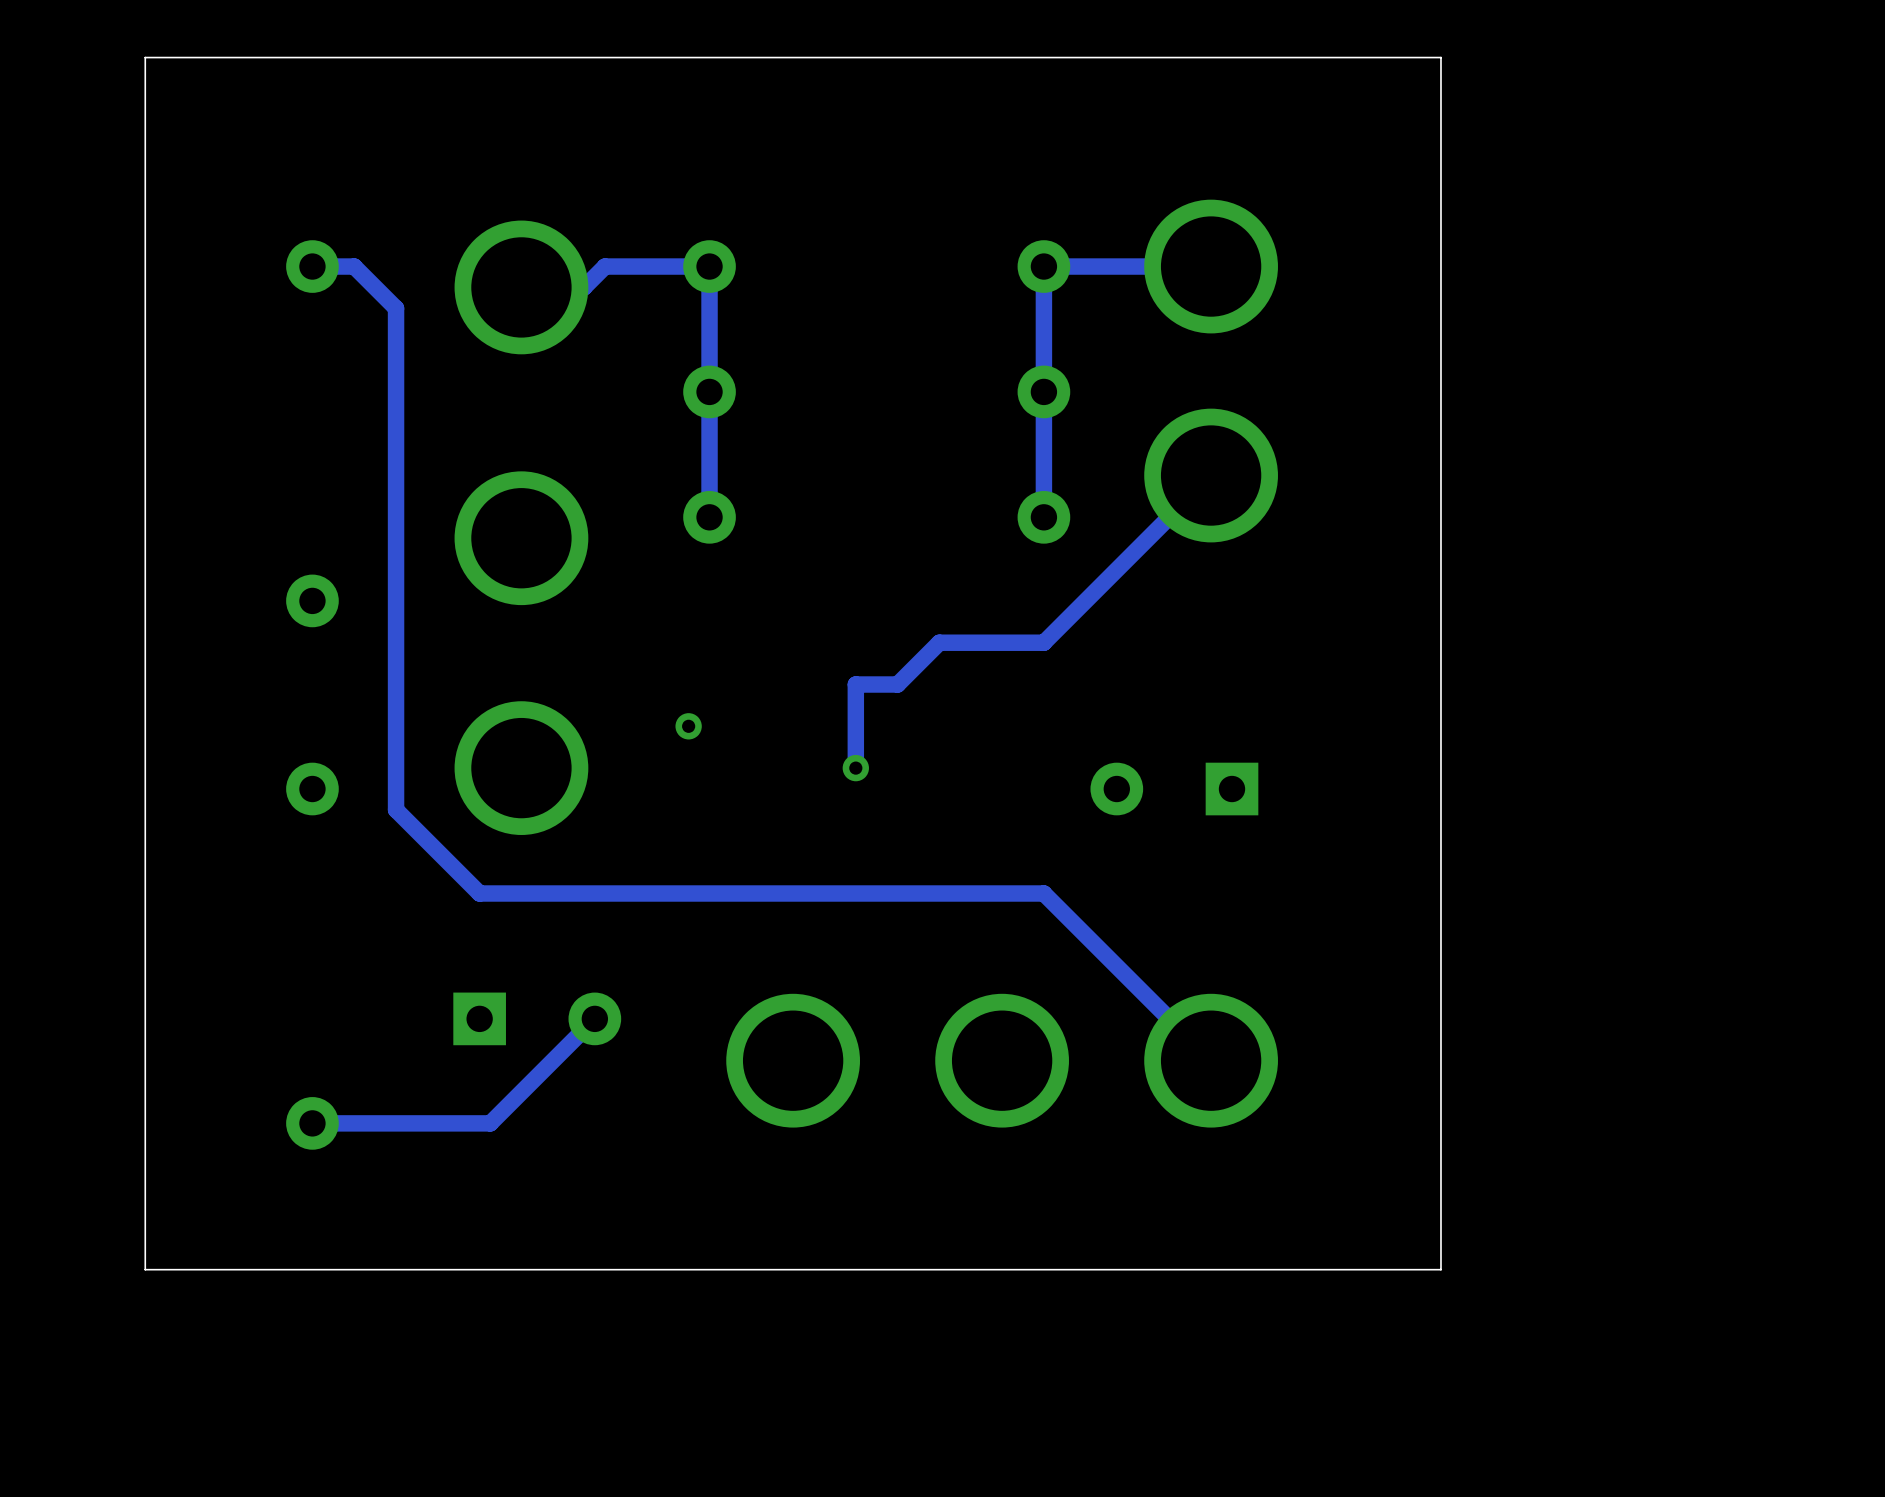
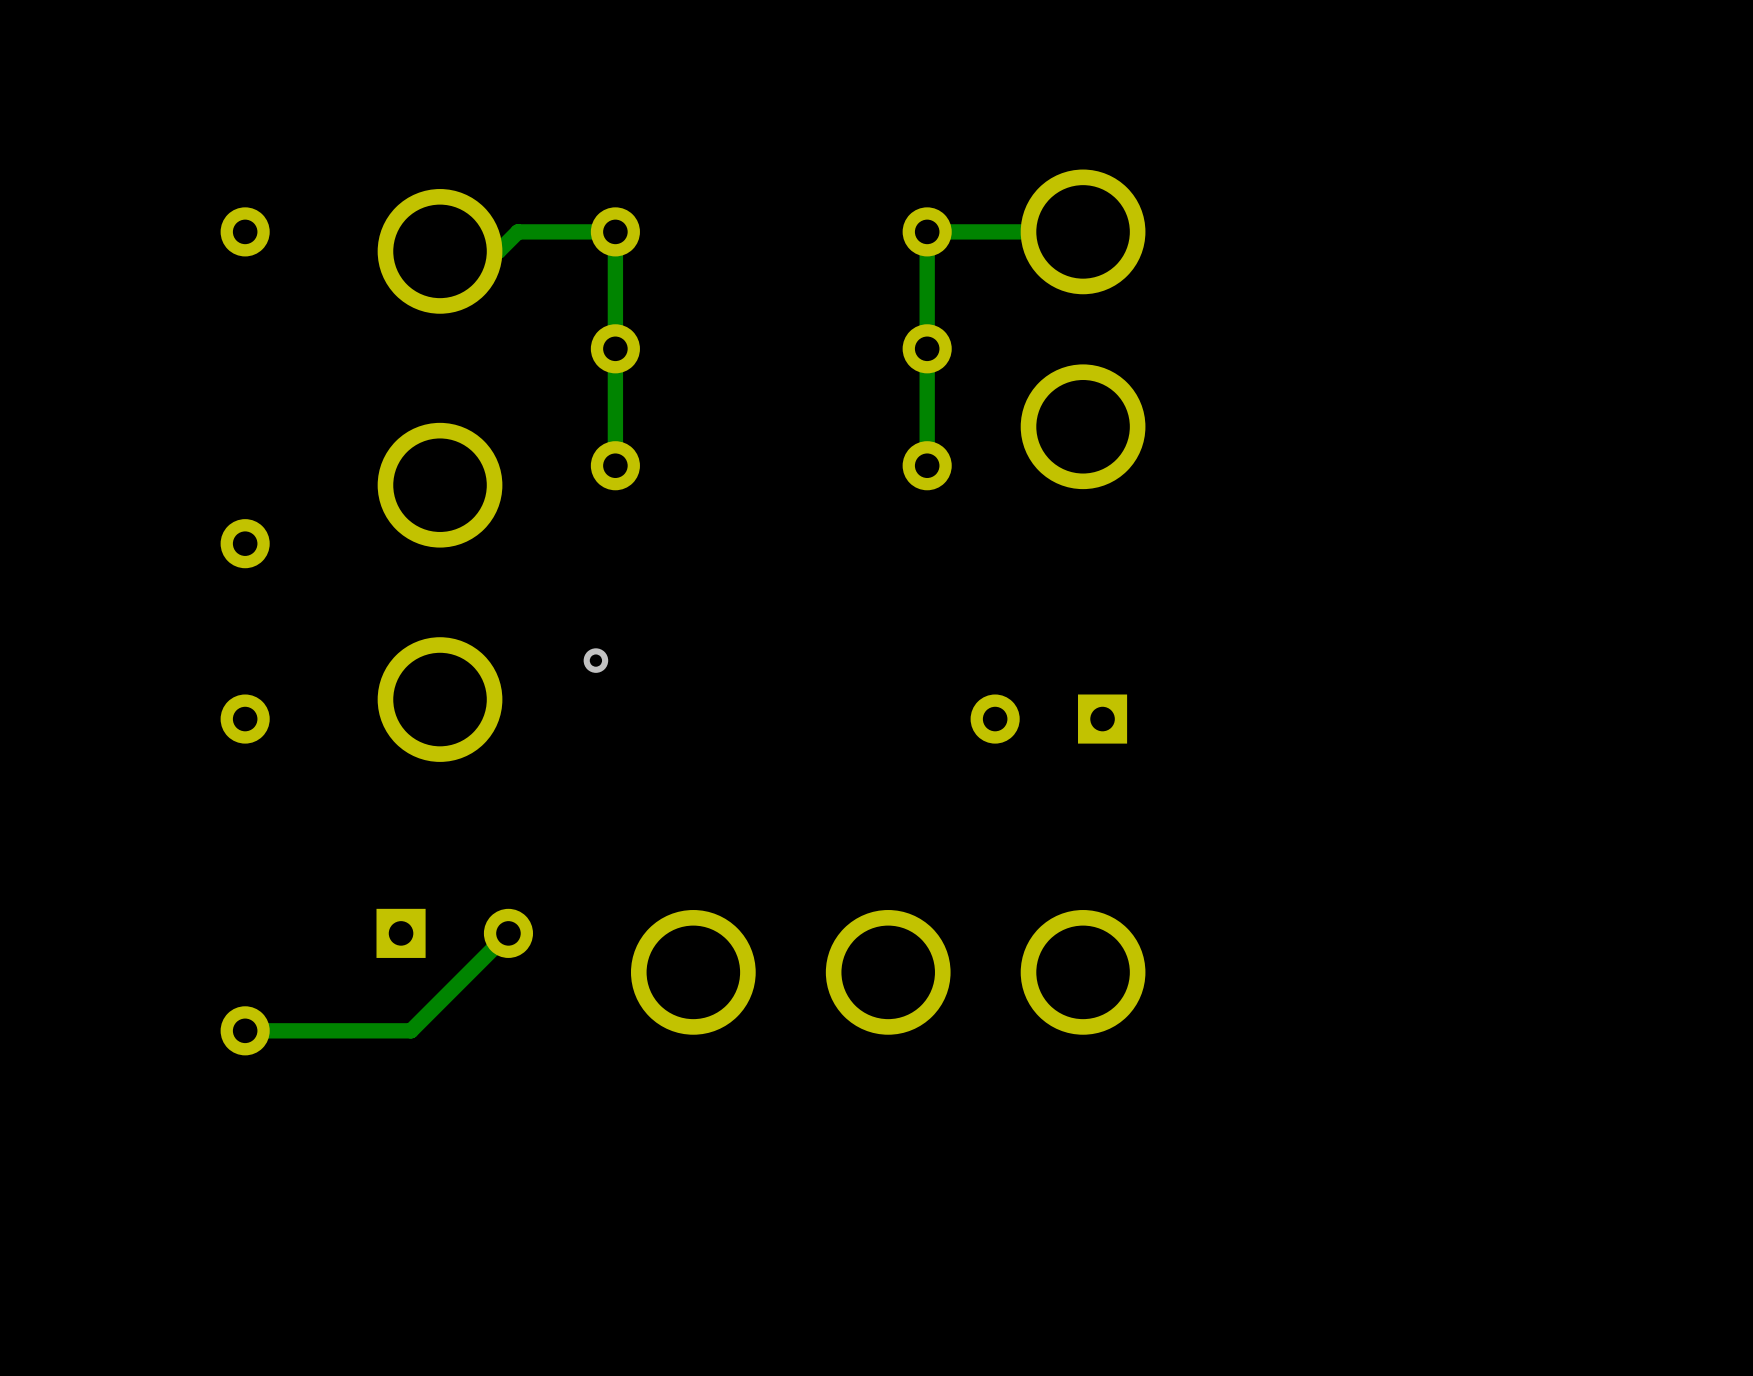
board edge: (1440, 57) (1440, 1269) (145, 1269) (145, 57) (1440, 57) -> none
track: (312, 266) (354, 266) (396, 308) (396, 809) (479, 893) (1043, 893) (1211, 1060) -> none
track: (1211, 475) (1043, 642) (939, 642) (897, 684) (855, 684) (855, 768) -> none
via: (855, 768) -> none

